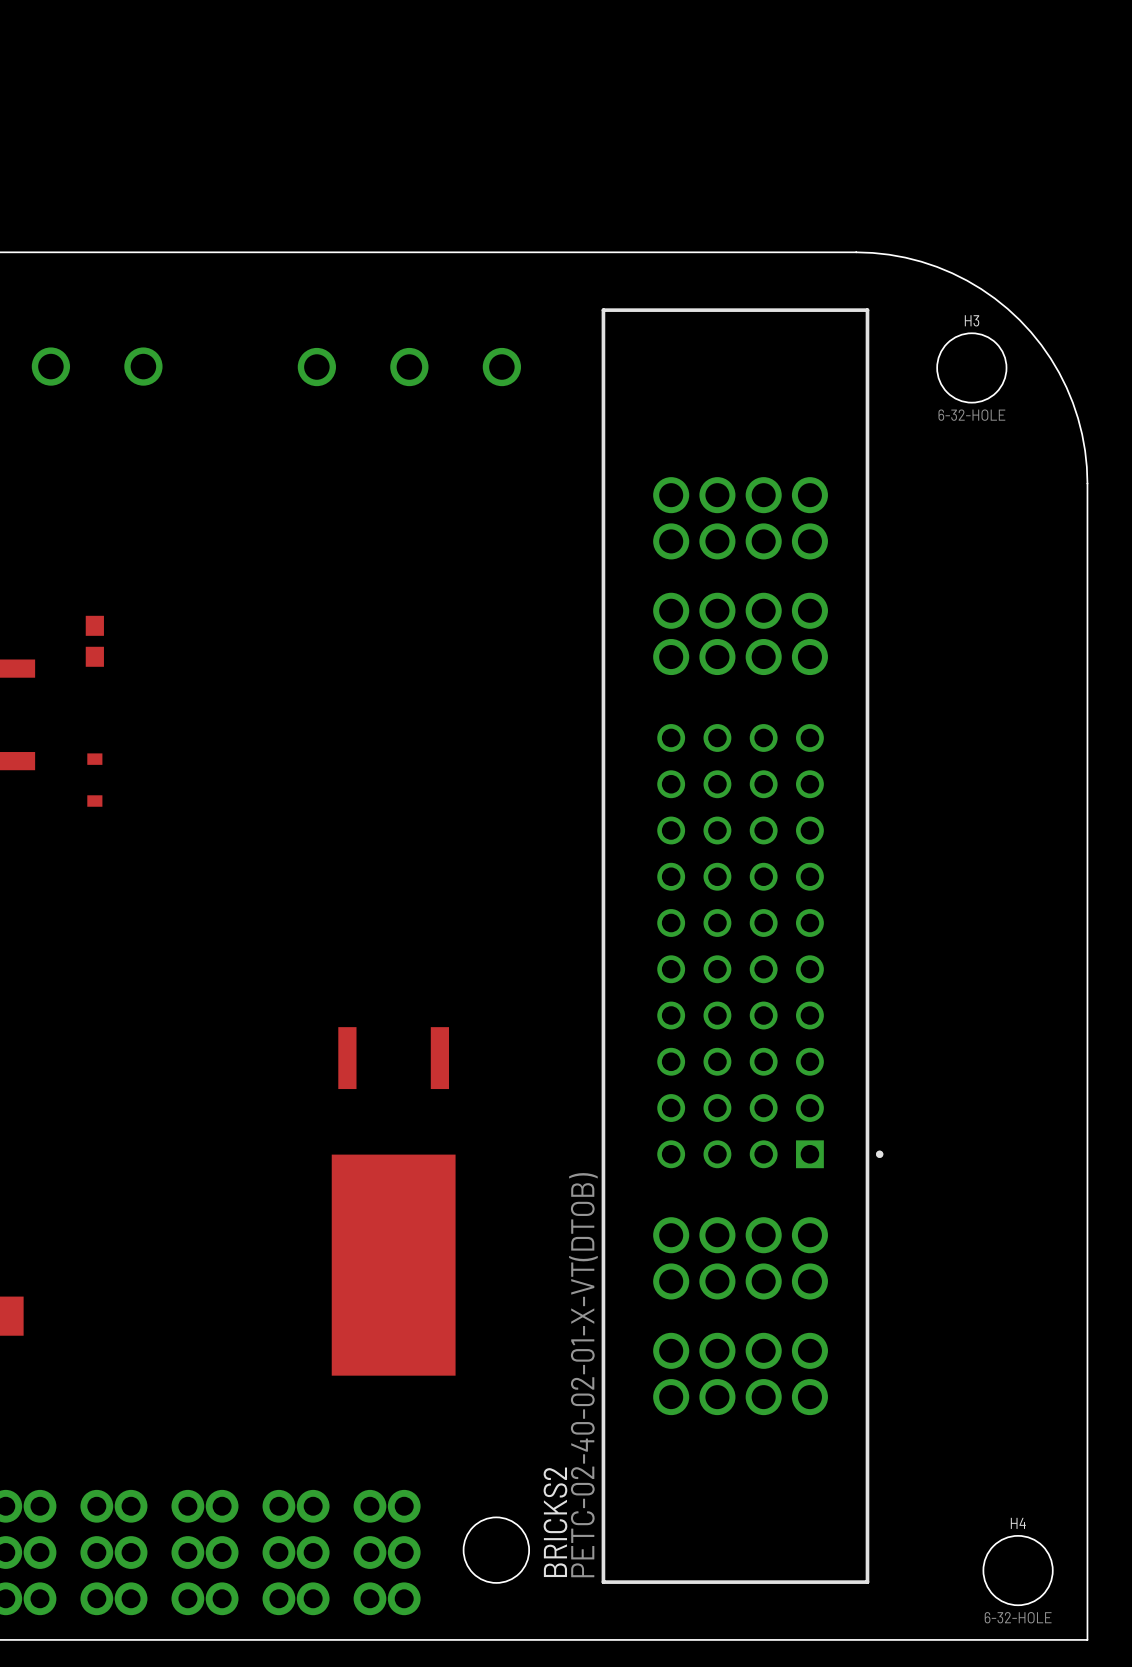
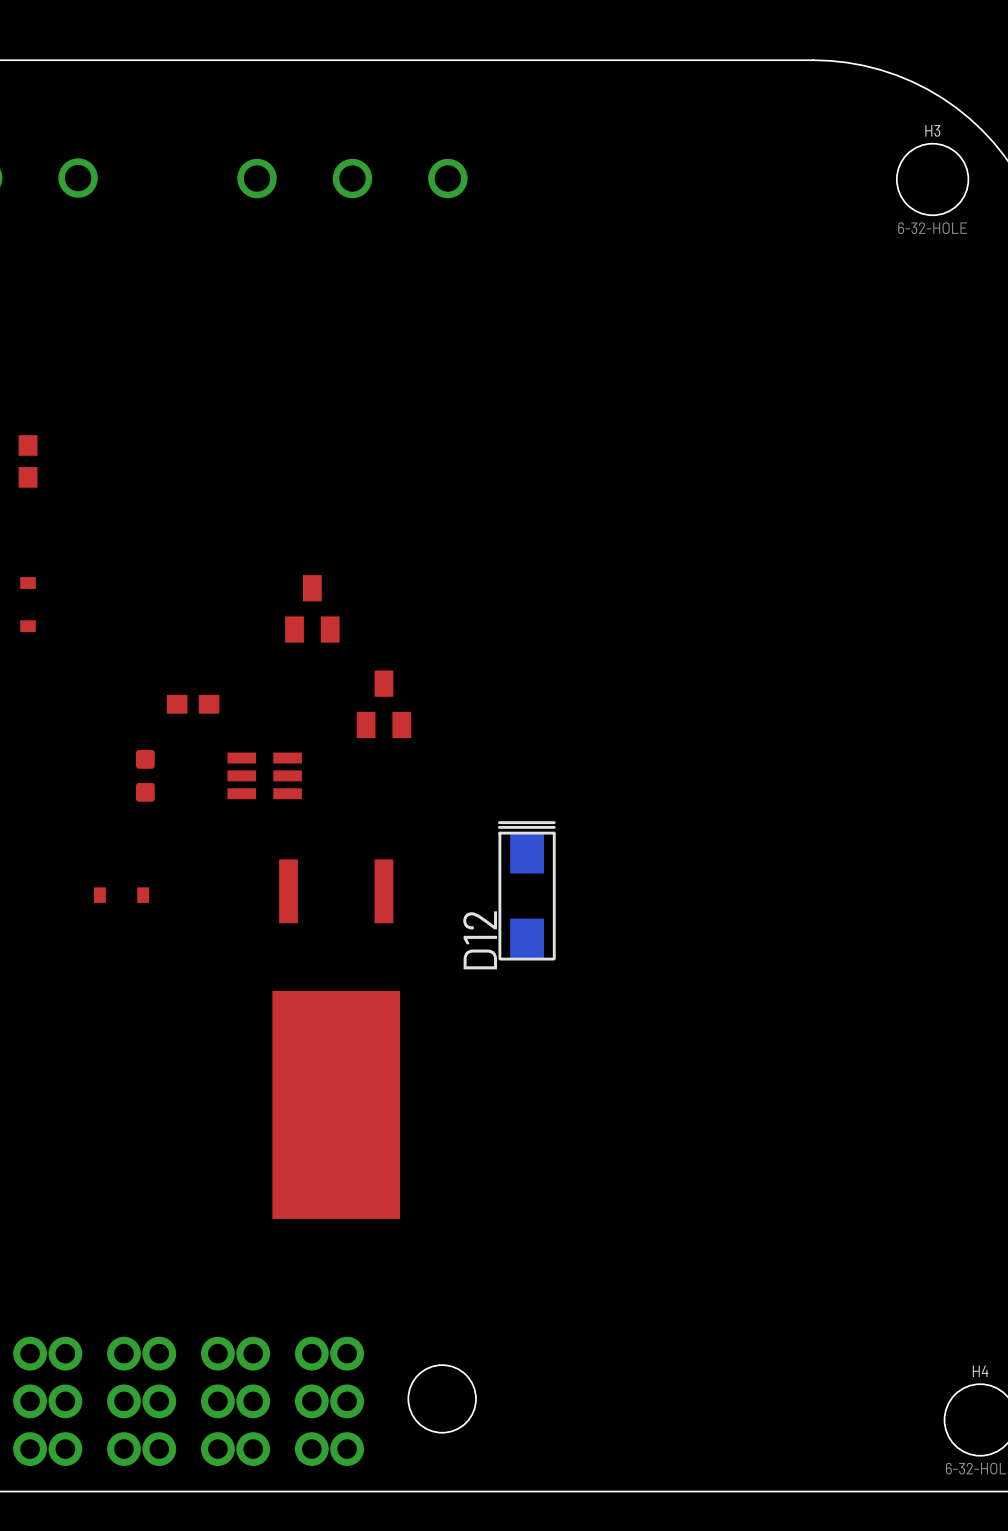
part: none -> (312, 608)
part: none -> (193, 704)
part: none -> (383, 704)
part: none -> (145, 775)
part: none -> (264, 775)
BRICKS2: PETC-02-40-02-01-X-VT(DTOB) (742, 946) -> none
D12: none -> (526, 890)
part: none -> (121, 895)

